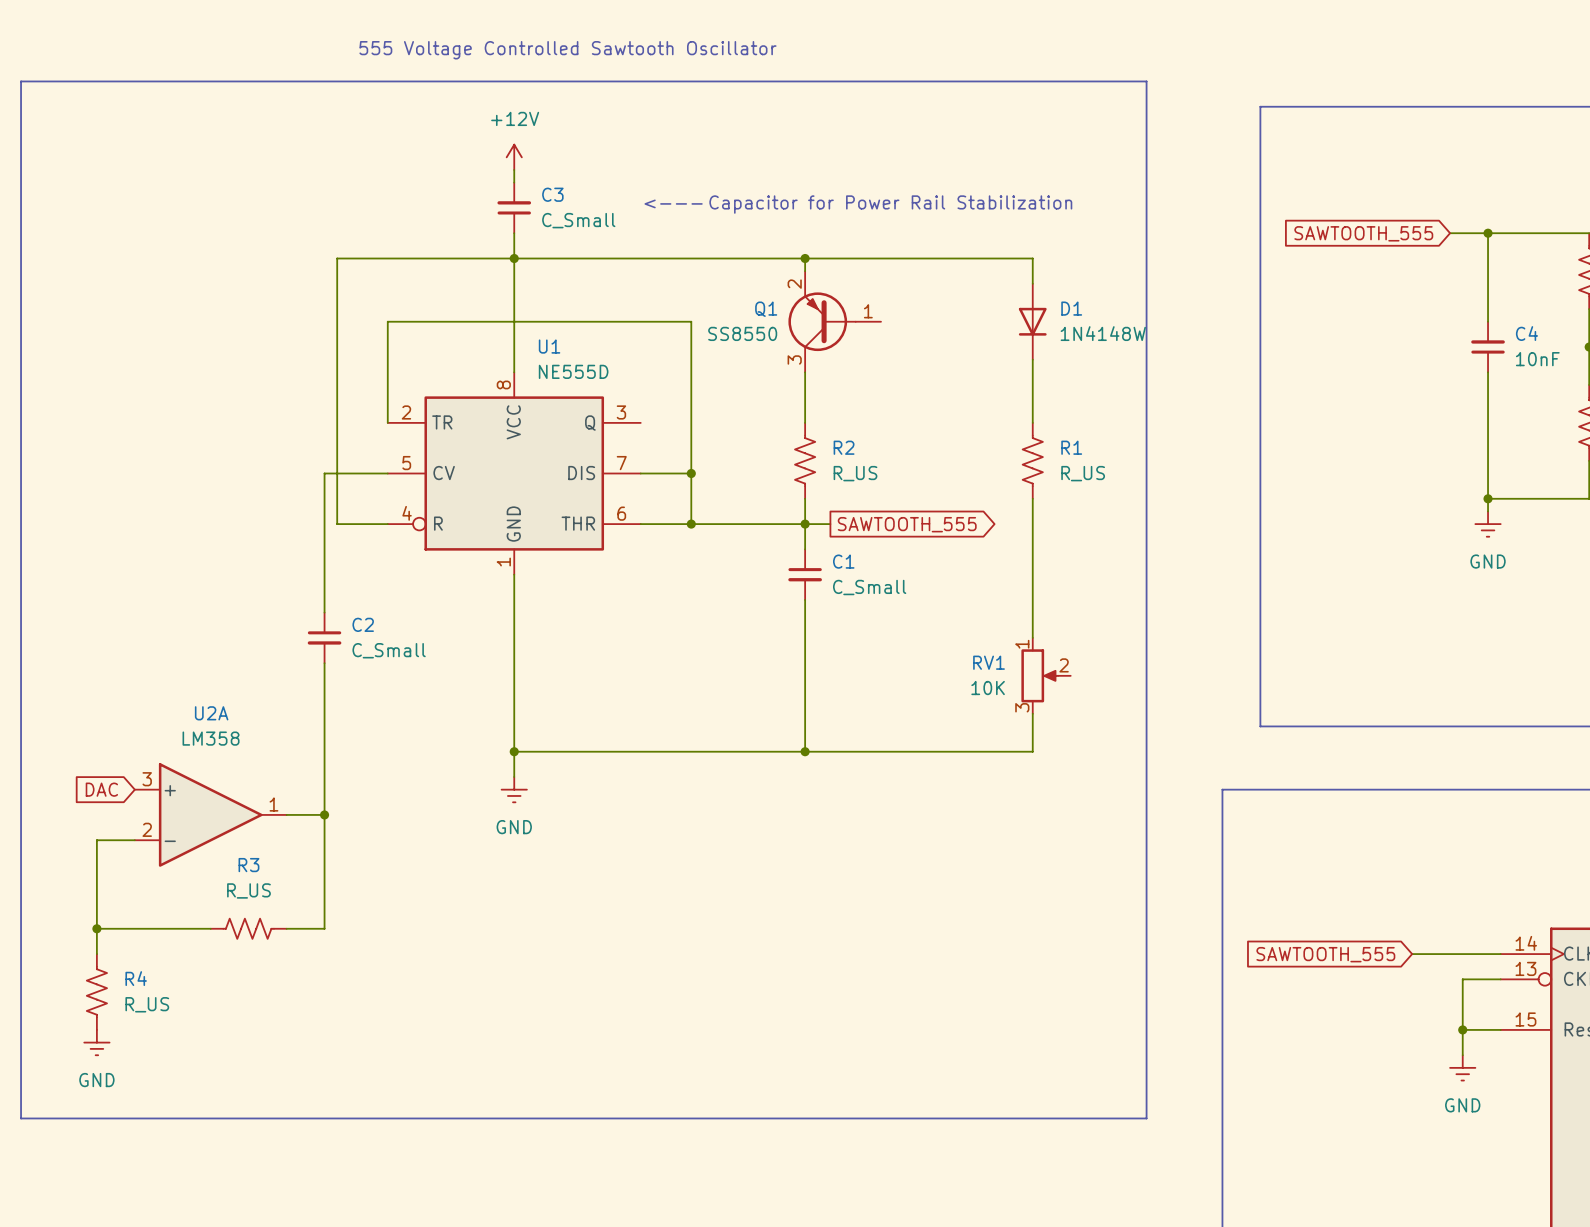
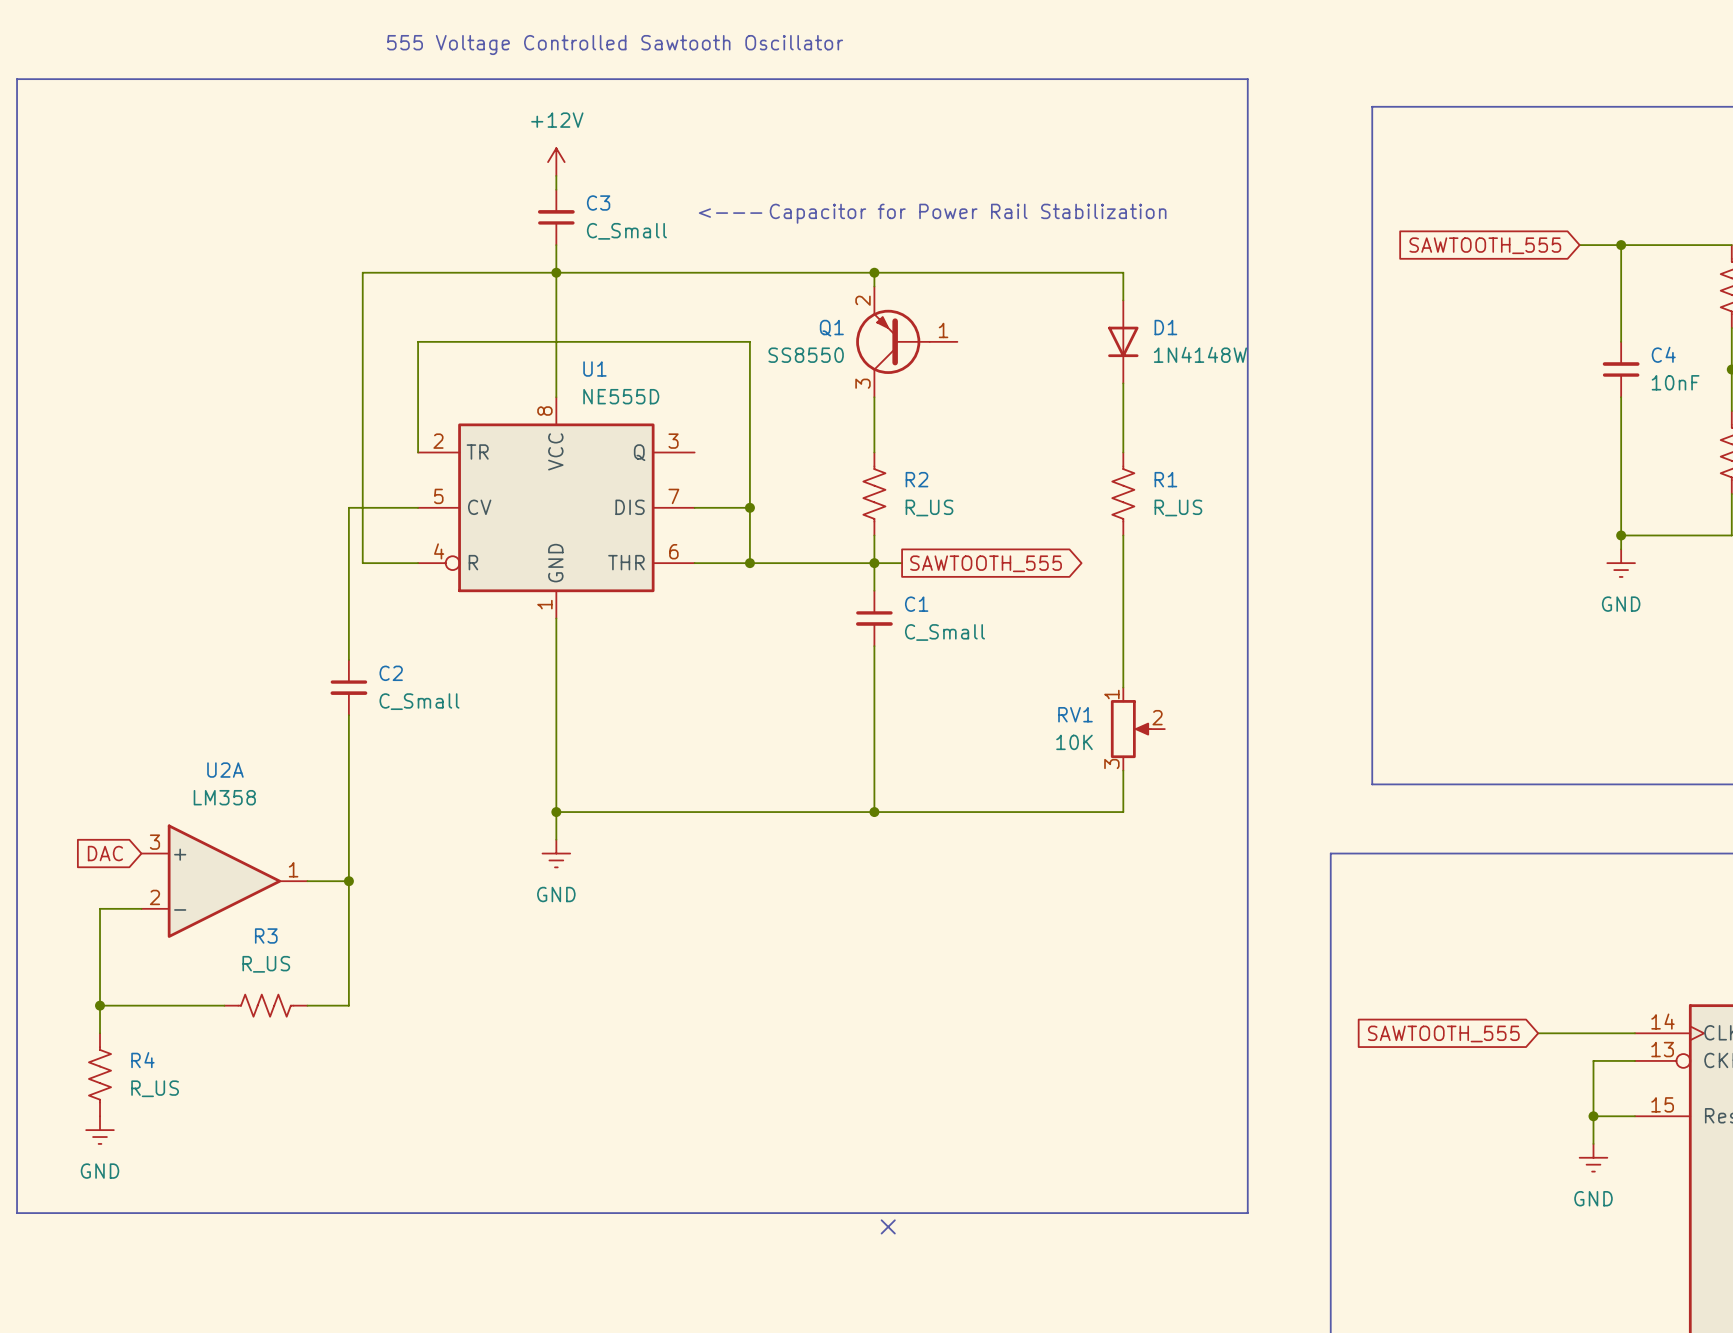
no-connect mark: none -> (888, 1226)

